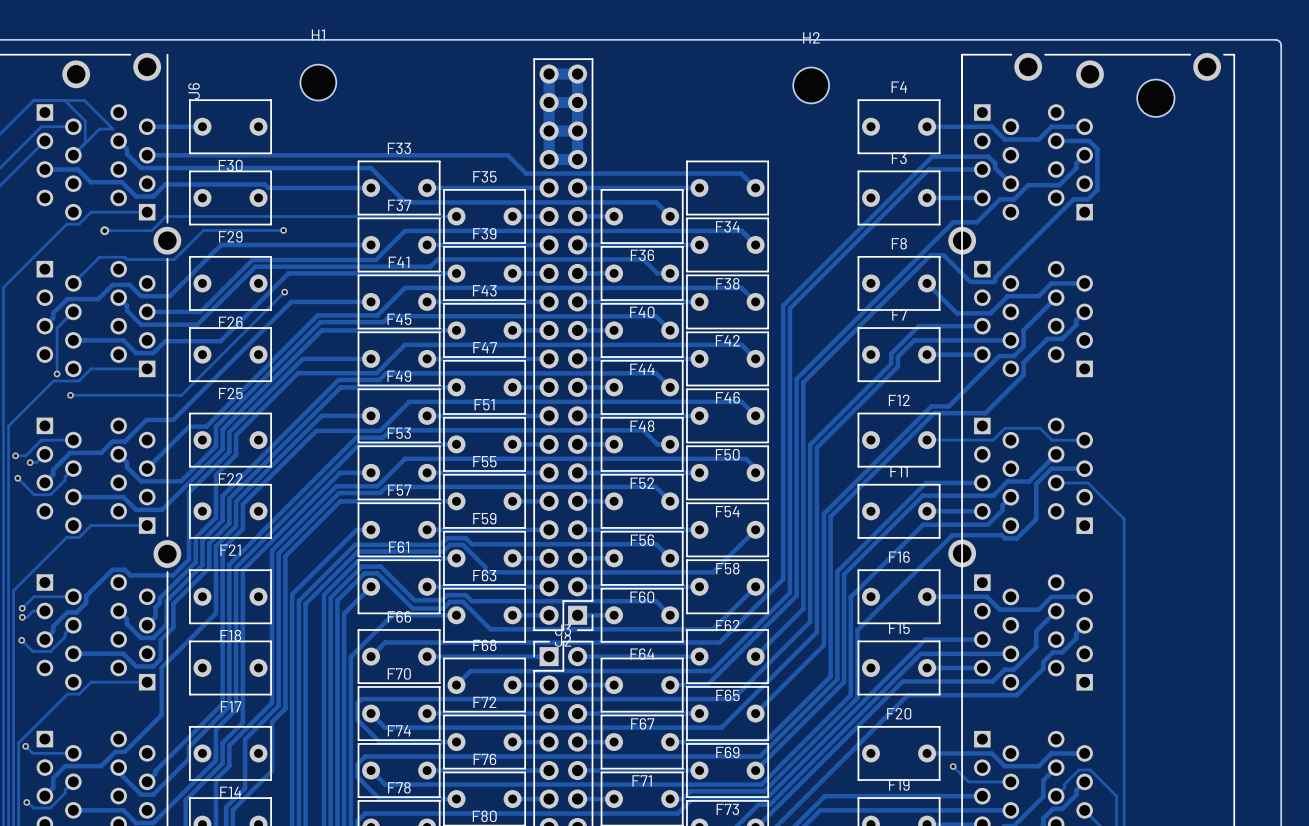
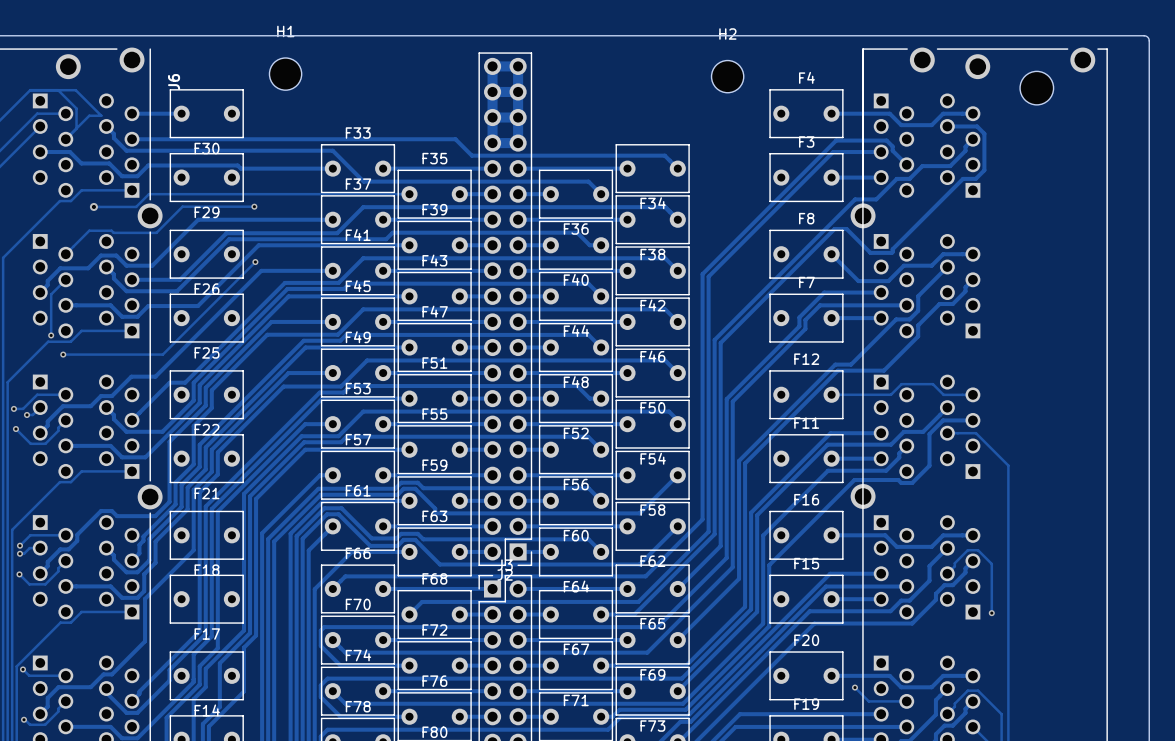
track: none -> (947, 573) (967, 550) (978, 550) (991, 563) (991, 613)
via: none -> (991, 613)

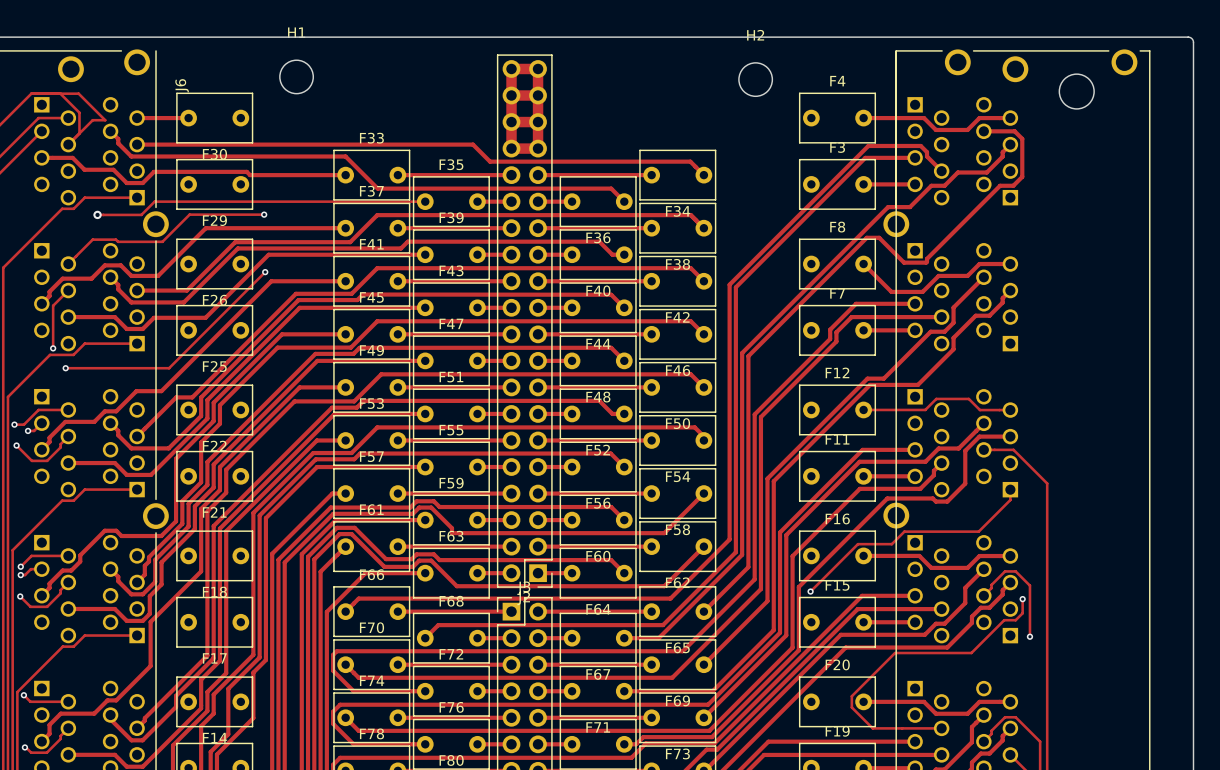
track: none -> (1010, 489) (1010, 500) (978, 531) (904, 531) (891, 544) (857, 544) (810, 591)
via: none -> (810, 591)
via: none -> (1022, 599)
track: (854, 687) (868, 701) -> (1022, 599) (1022, 613) (1015, 620) (1004, 620) (971, 653) (895, 653) (851, 696) (851, 707) (872, 728) (902, 728)
via: (854, 687) -> none

